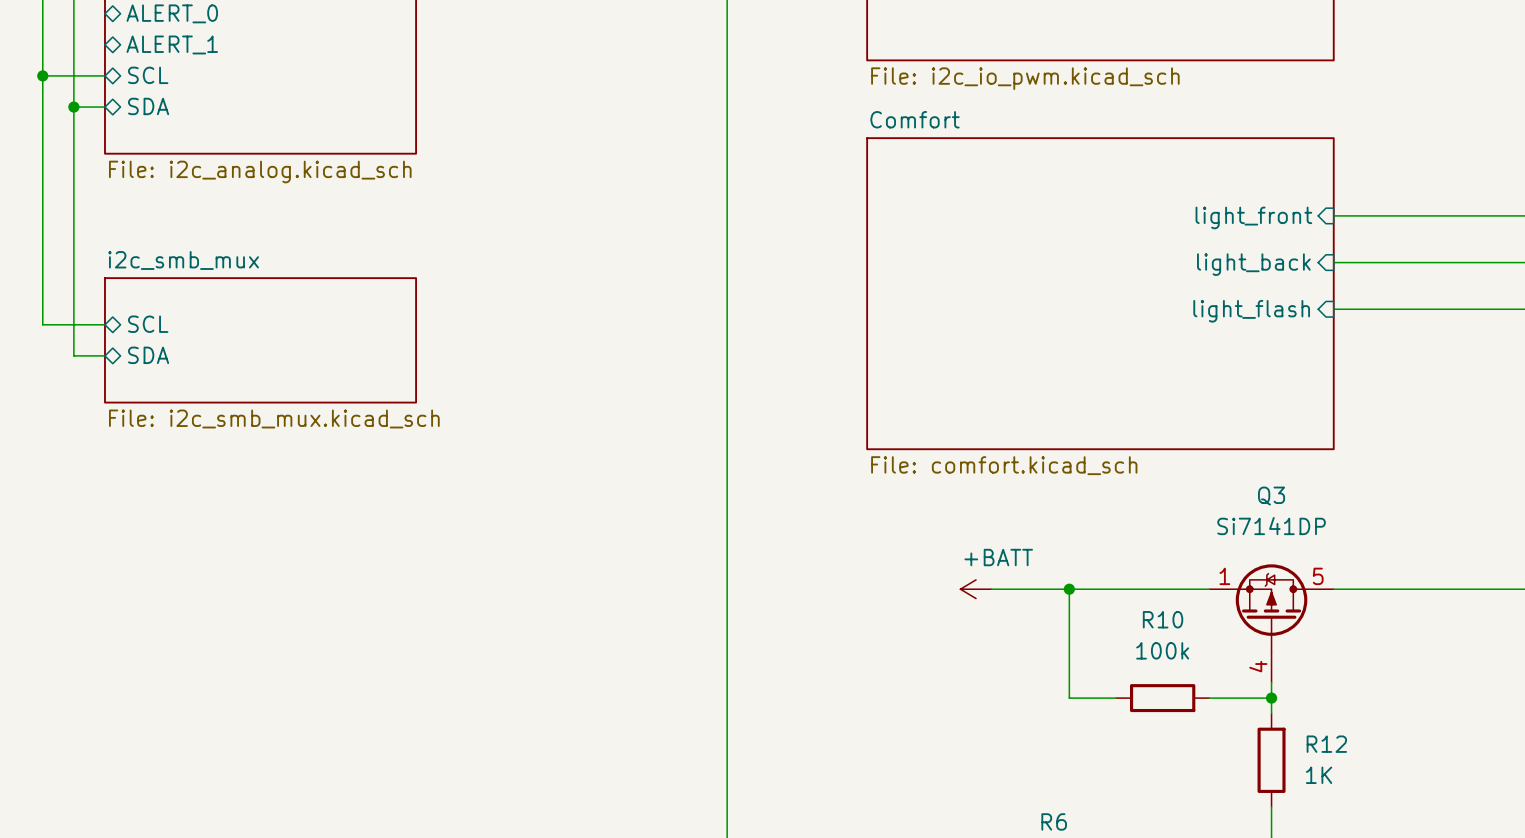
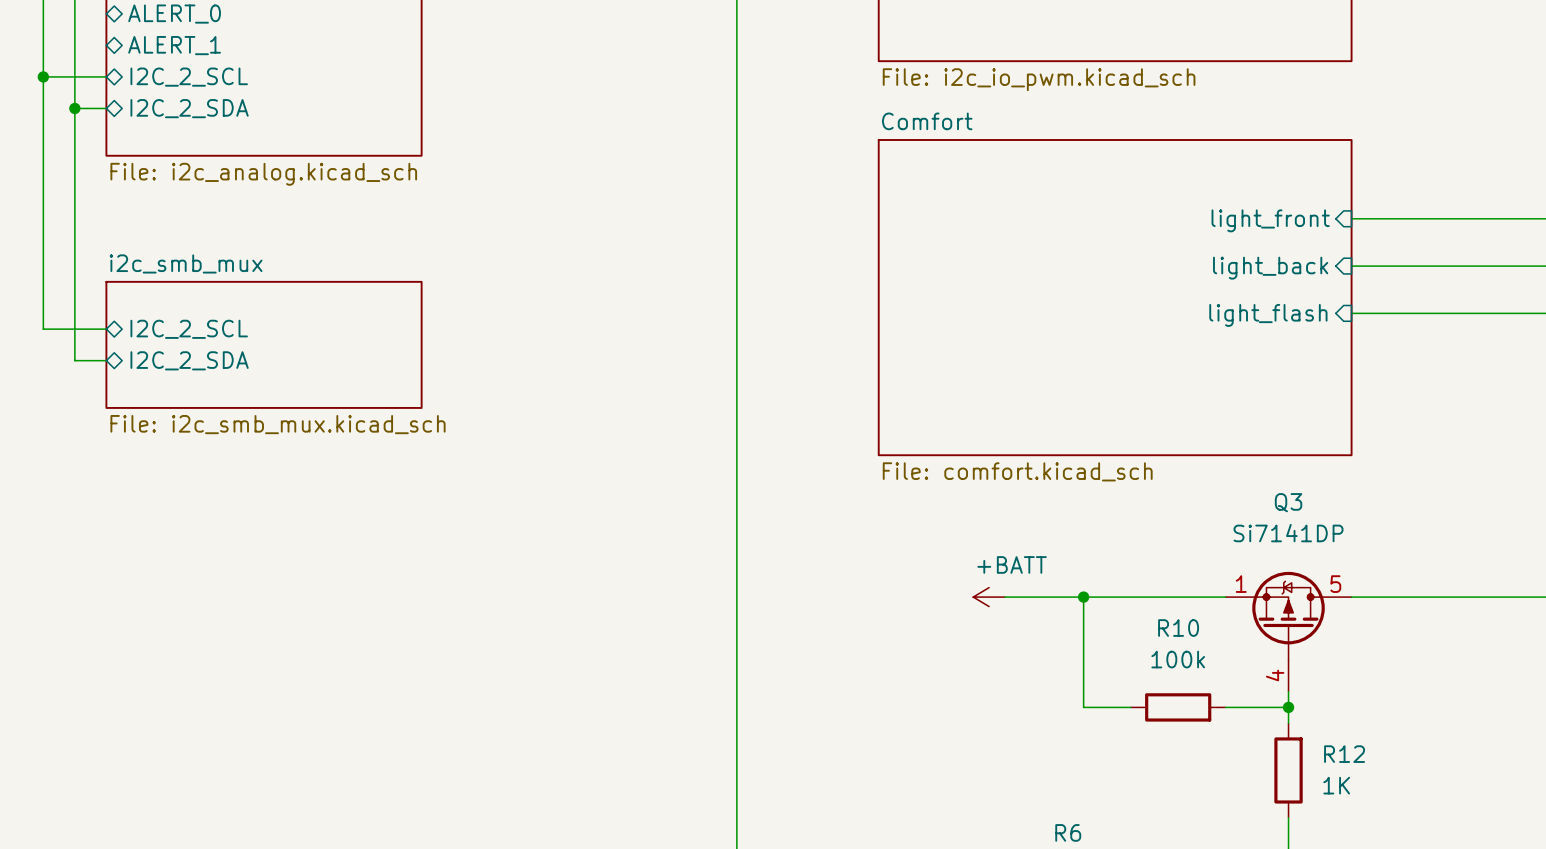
sheet pin: SCL (148, 75) -> I2C_2_SCL (189, 77)
sheet pin: SDA (148, 106) -> I2C_2_SDA (189, 108)
sheet pin: SCL (148, 324) -> I2C_2_SCL (189, 329)
sheet pin: SDA (148, 355) -> I2C_2_SDA (189, 360)

